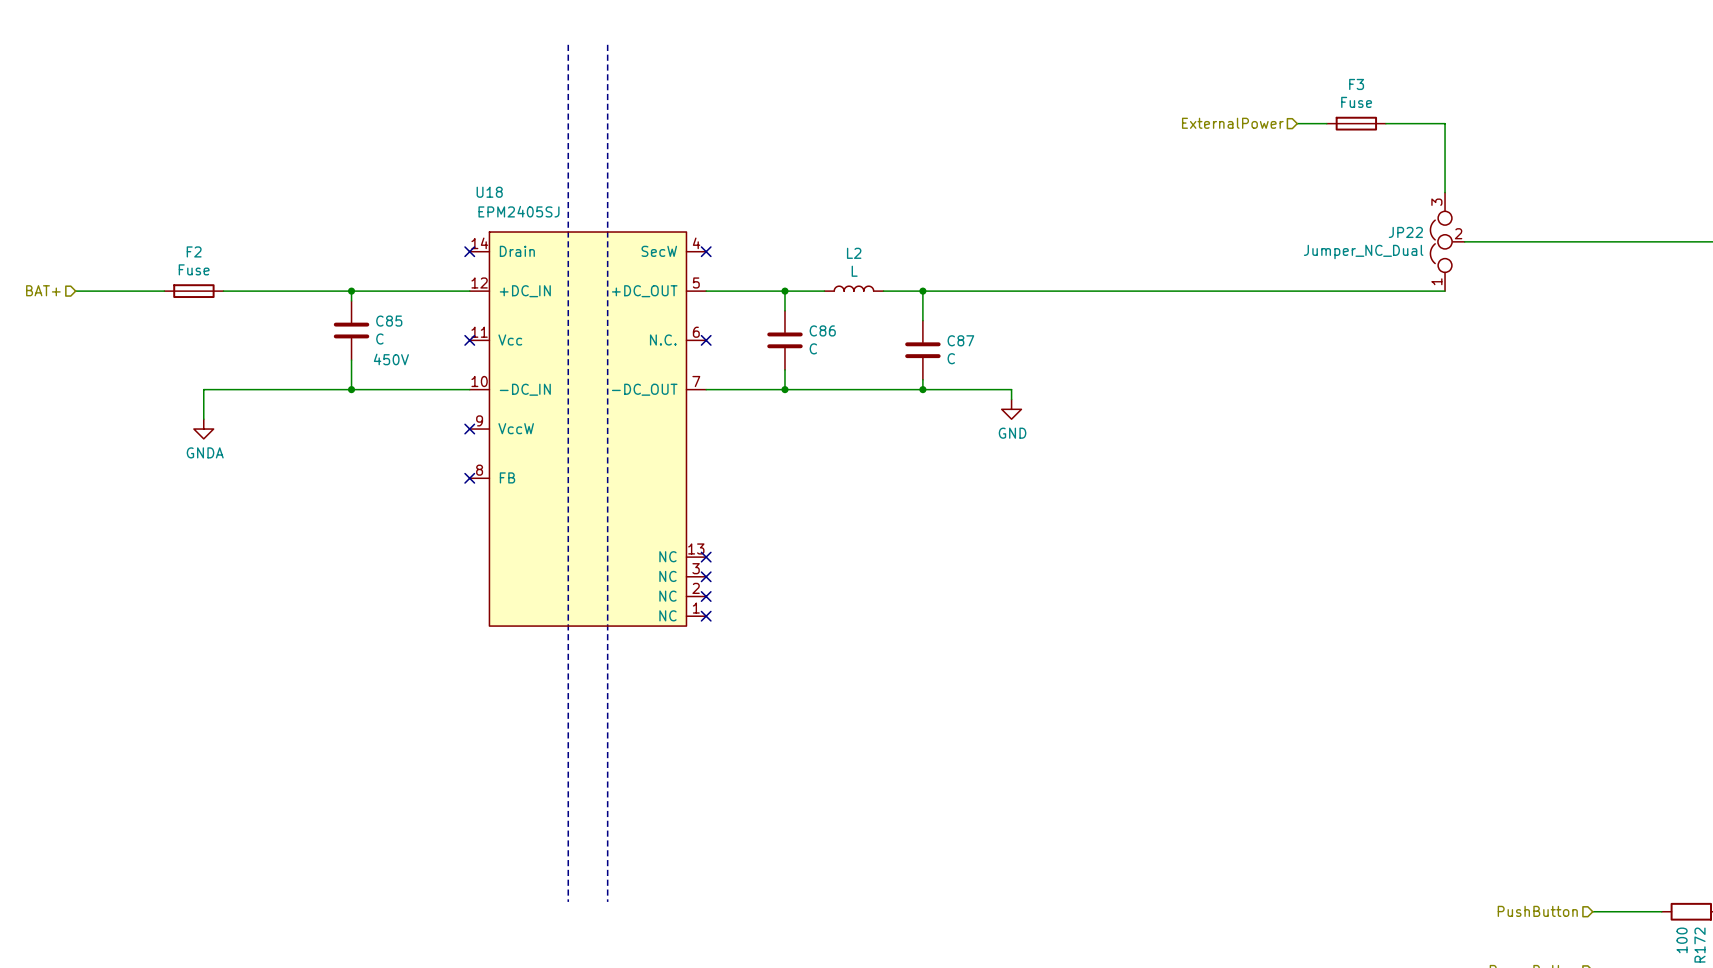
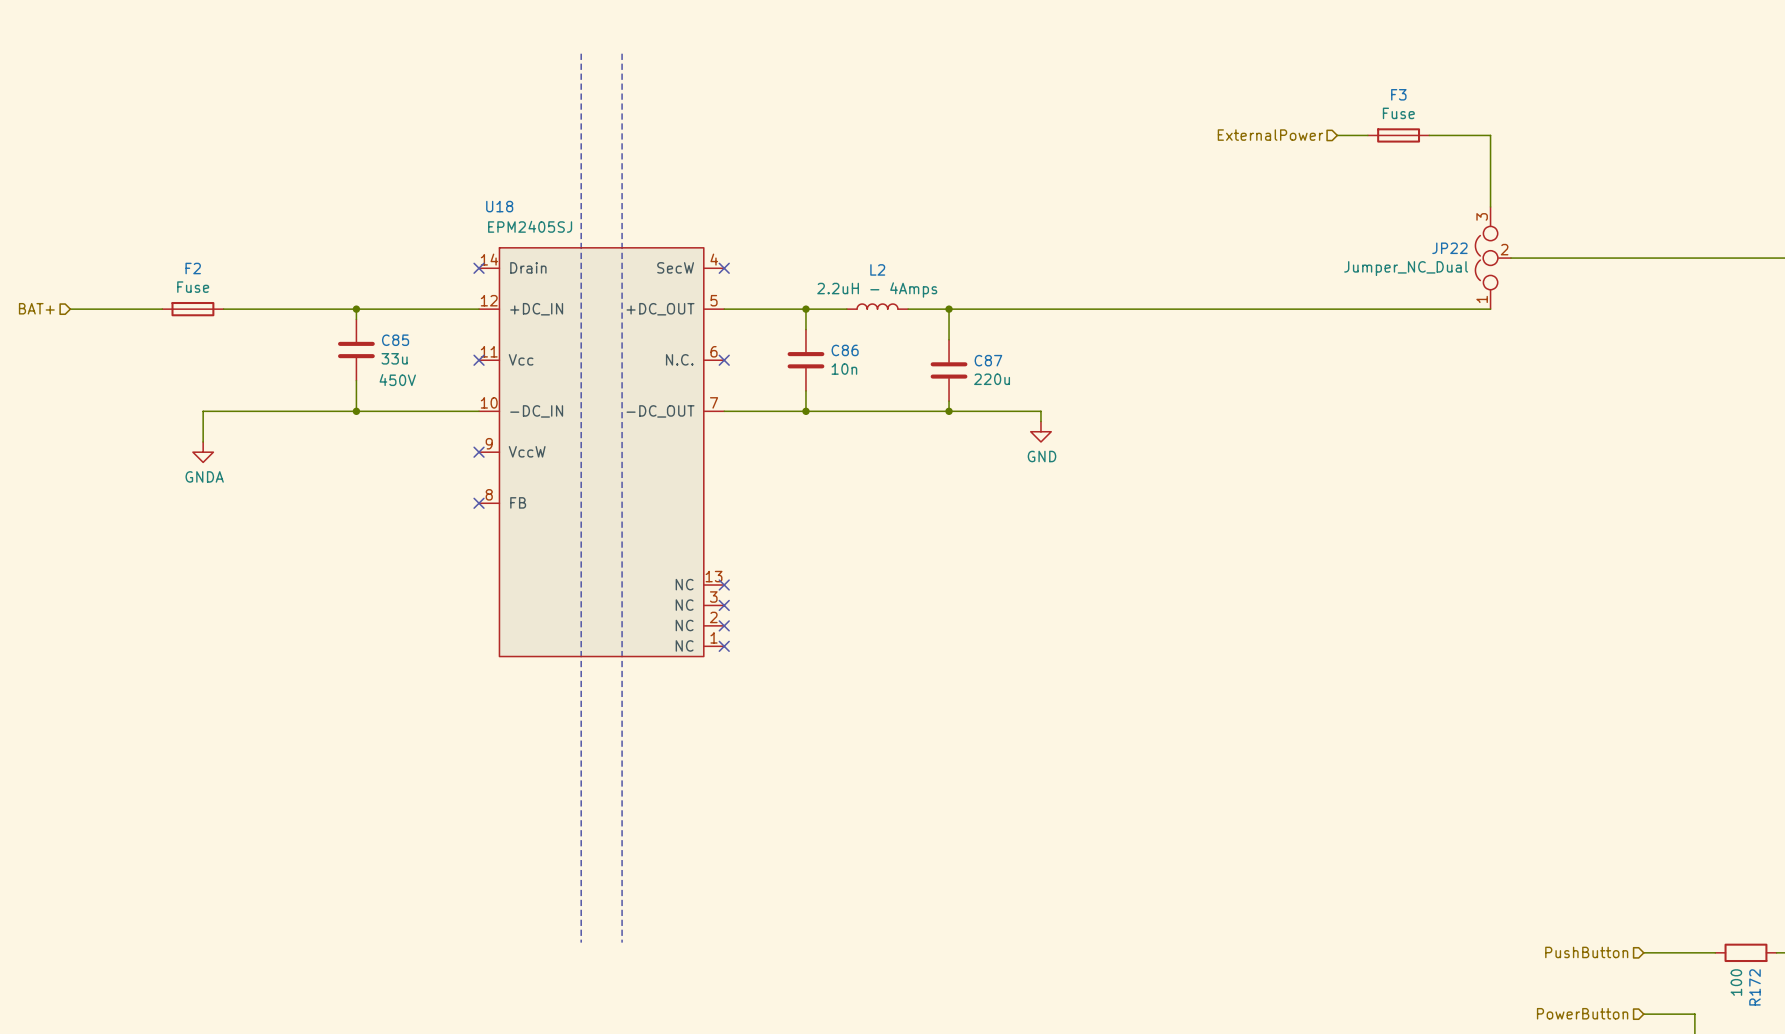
L2 value: L (854, 271) -> 2.2uH - 4Amps (877, 289)
C85 value: C (379, 339) -> 33u (394, 358)
C86 value: C (813, 348) -> 10n (844, 369)
C87 value: C (951, 358) -> 220u (992, 379)

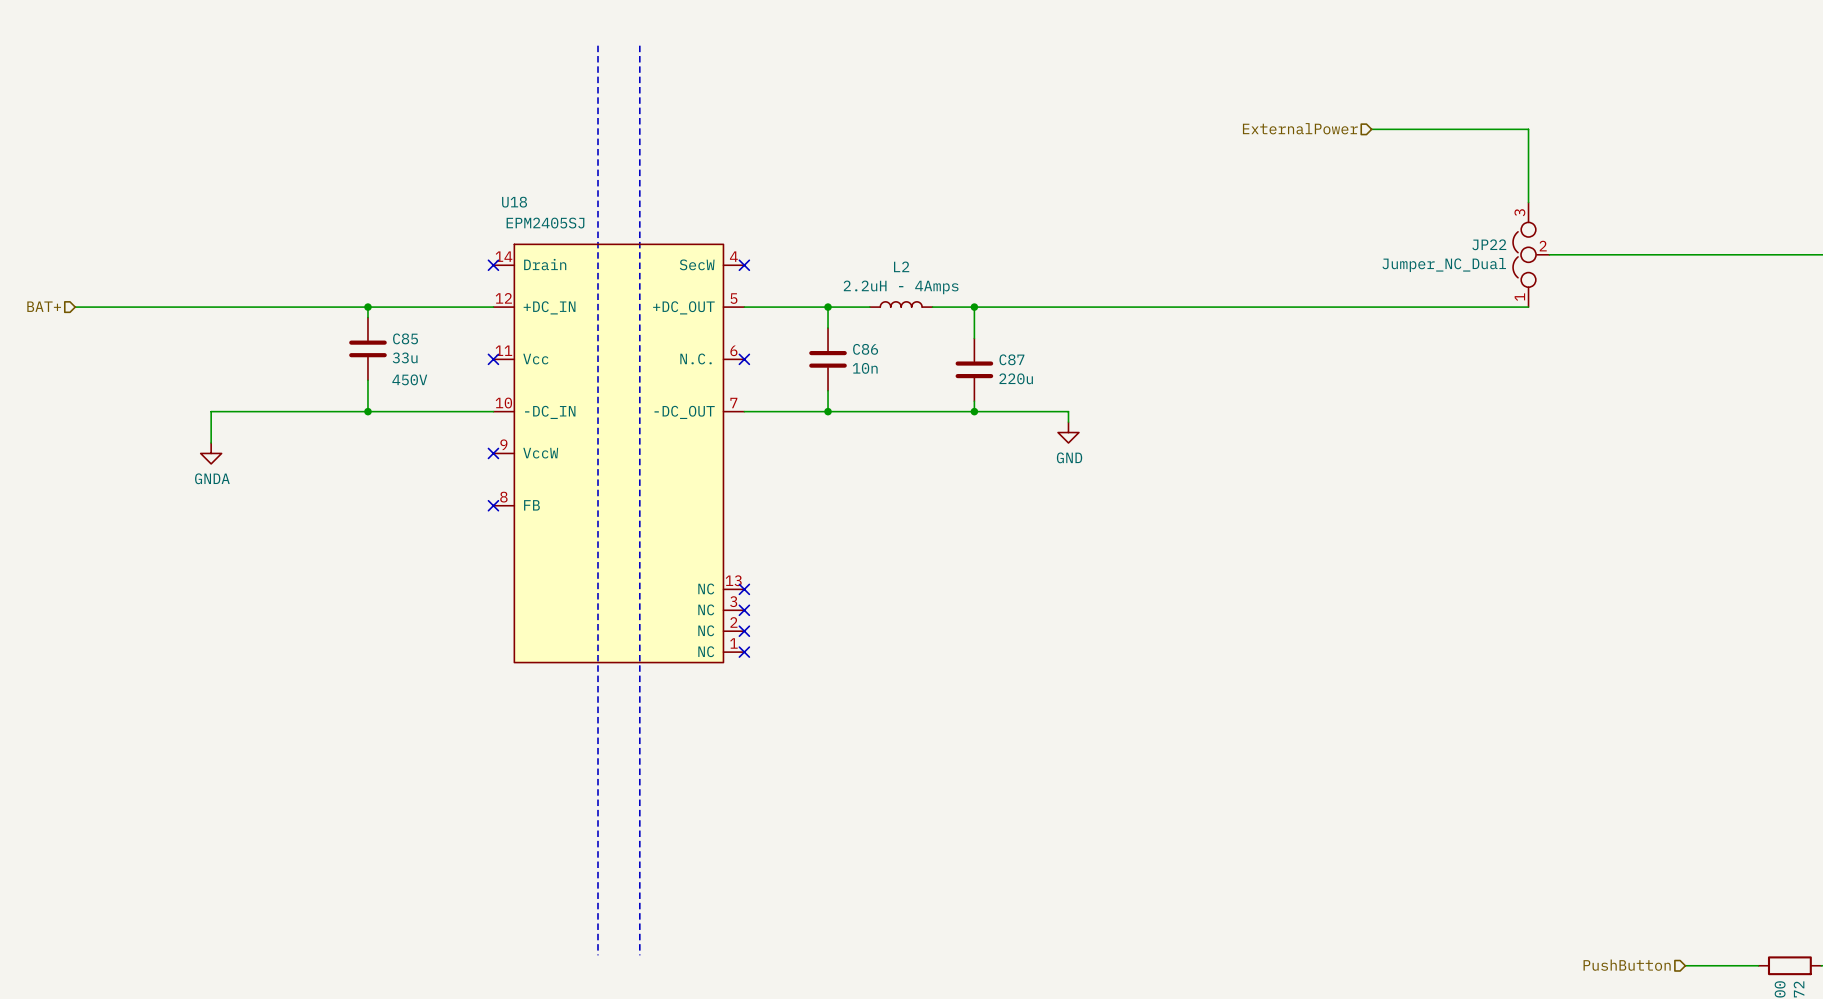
F3: Fuse (1398, 135) -> none
F2: Fuse (192, 309) -> none

